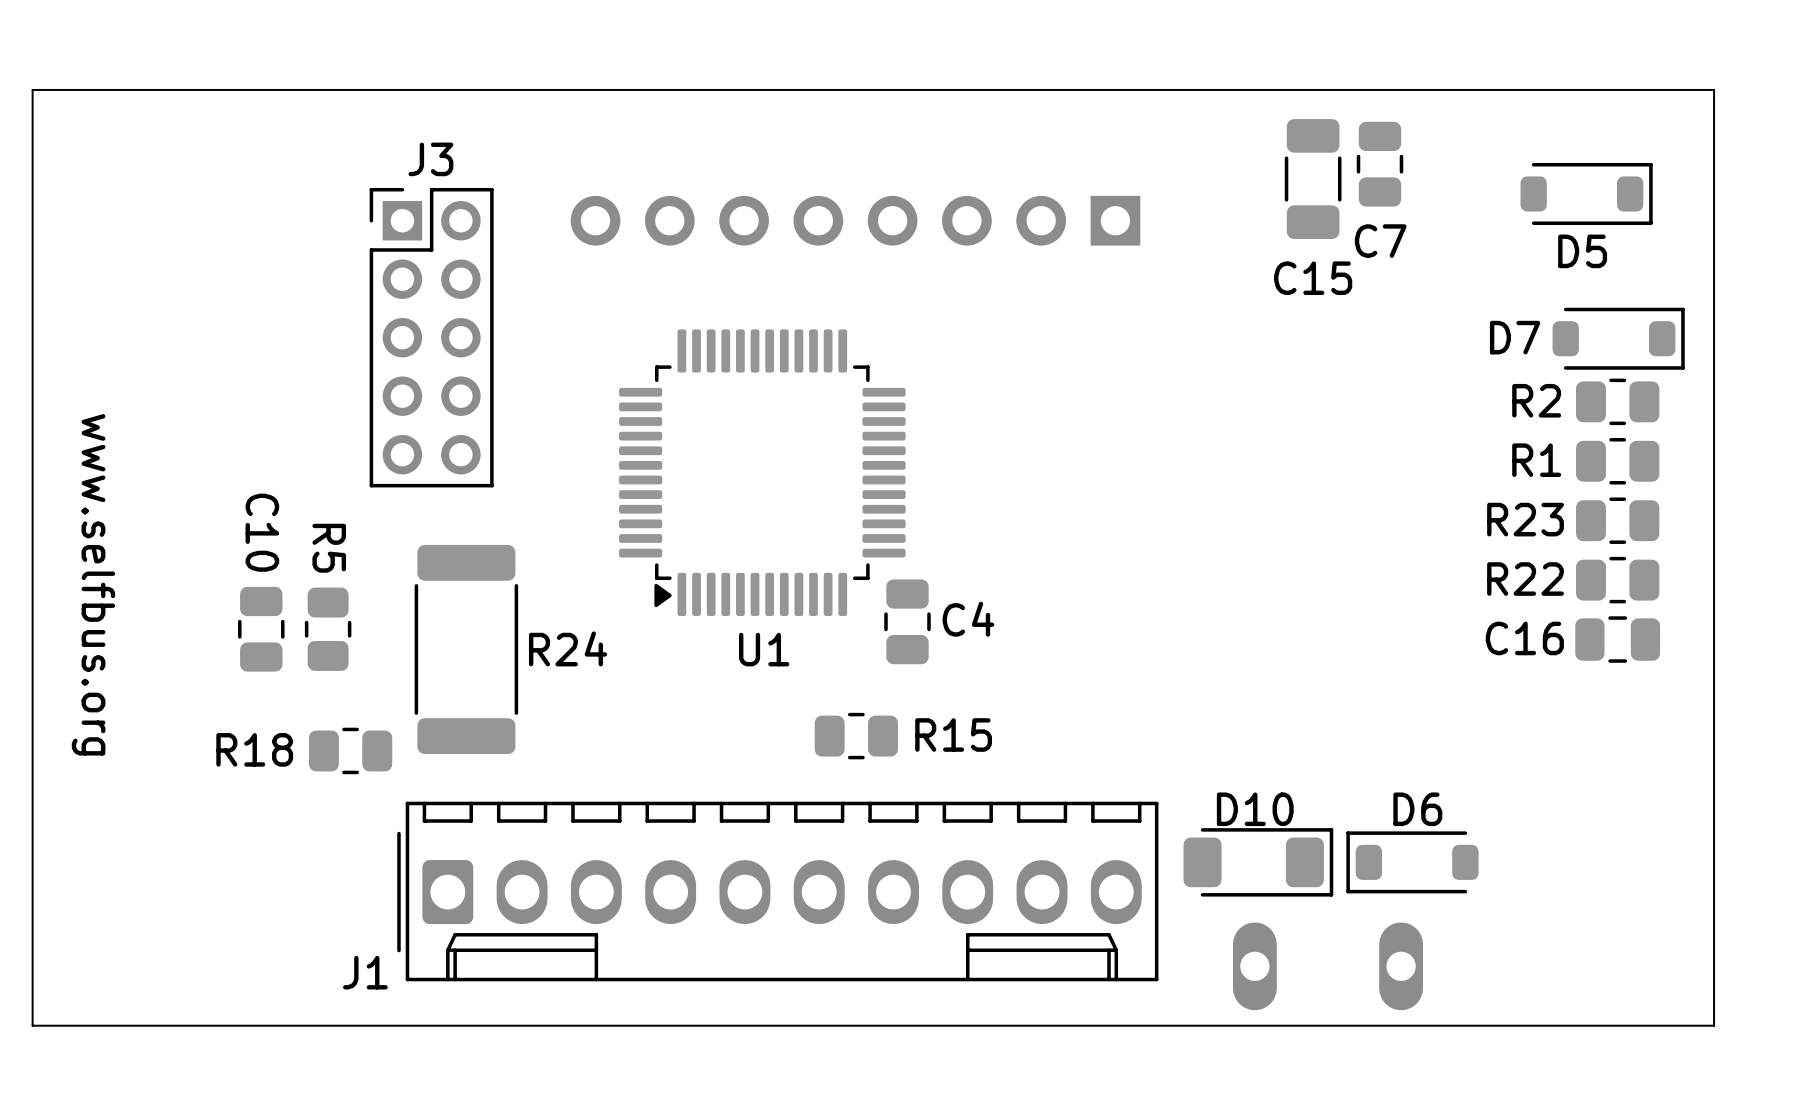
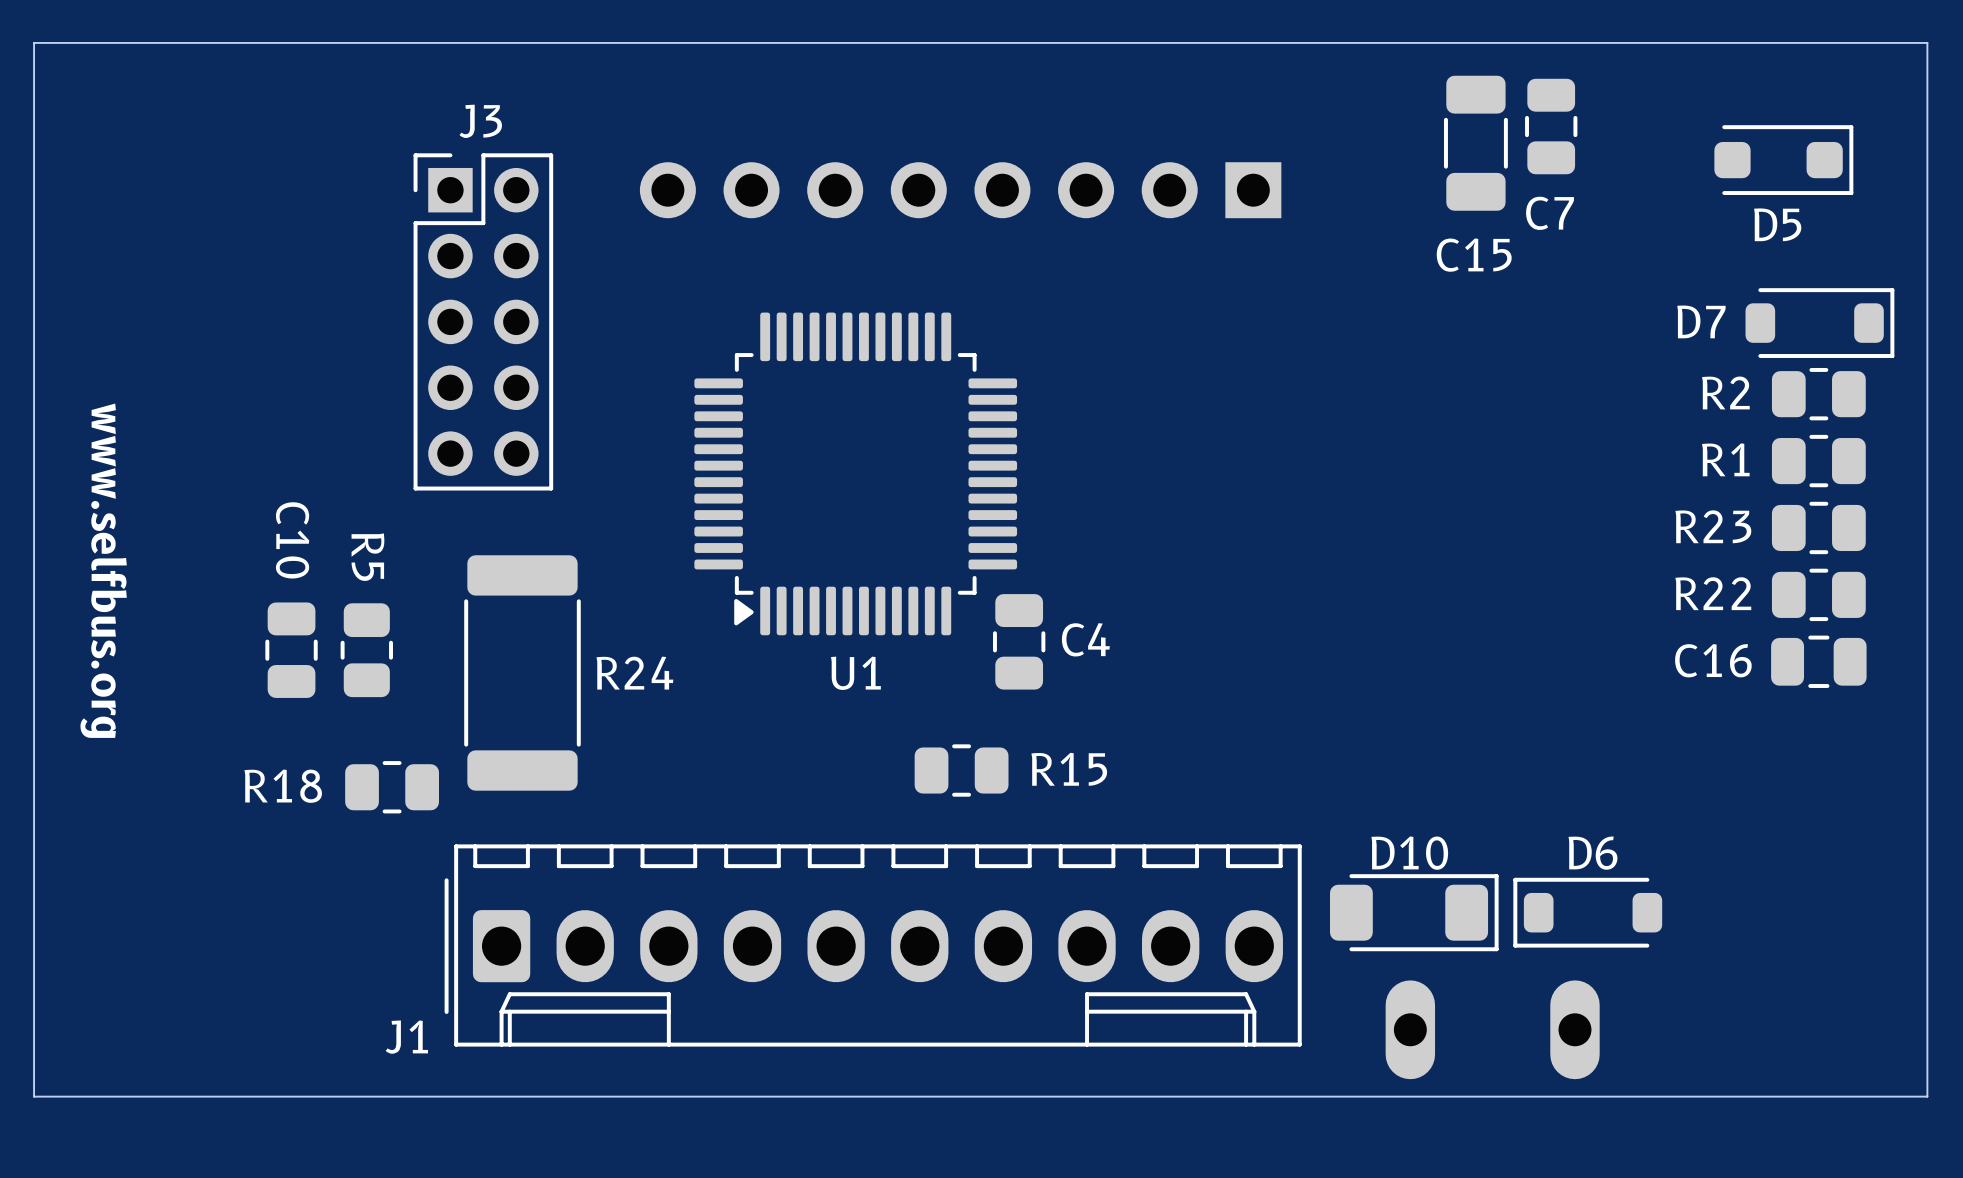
D5 footprint: [1520, 162, 1653, 225] -> [1714, 125, 1854, 196]

